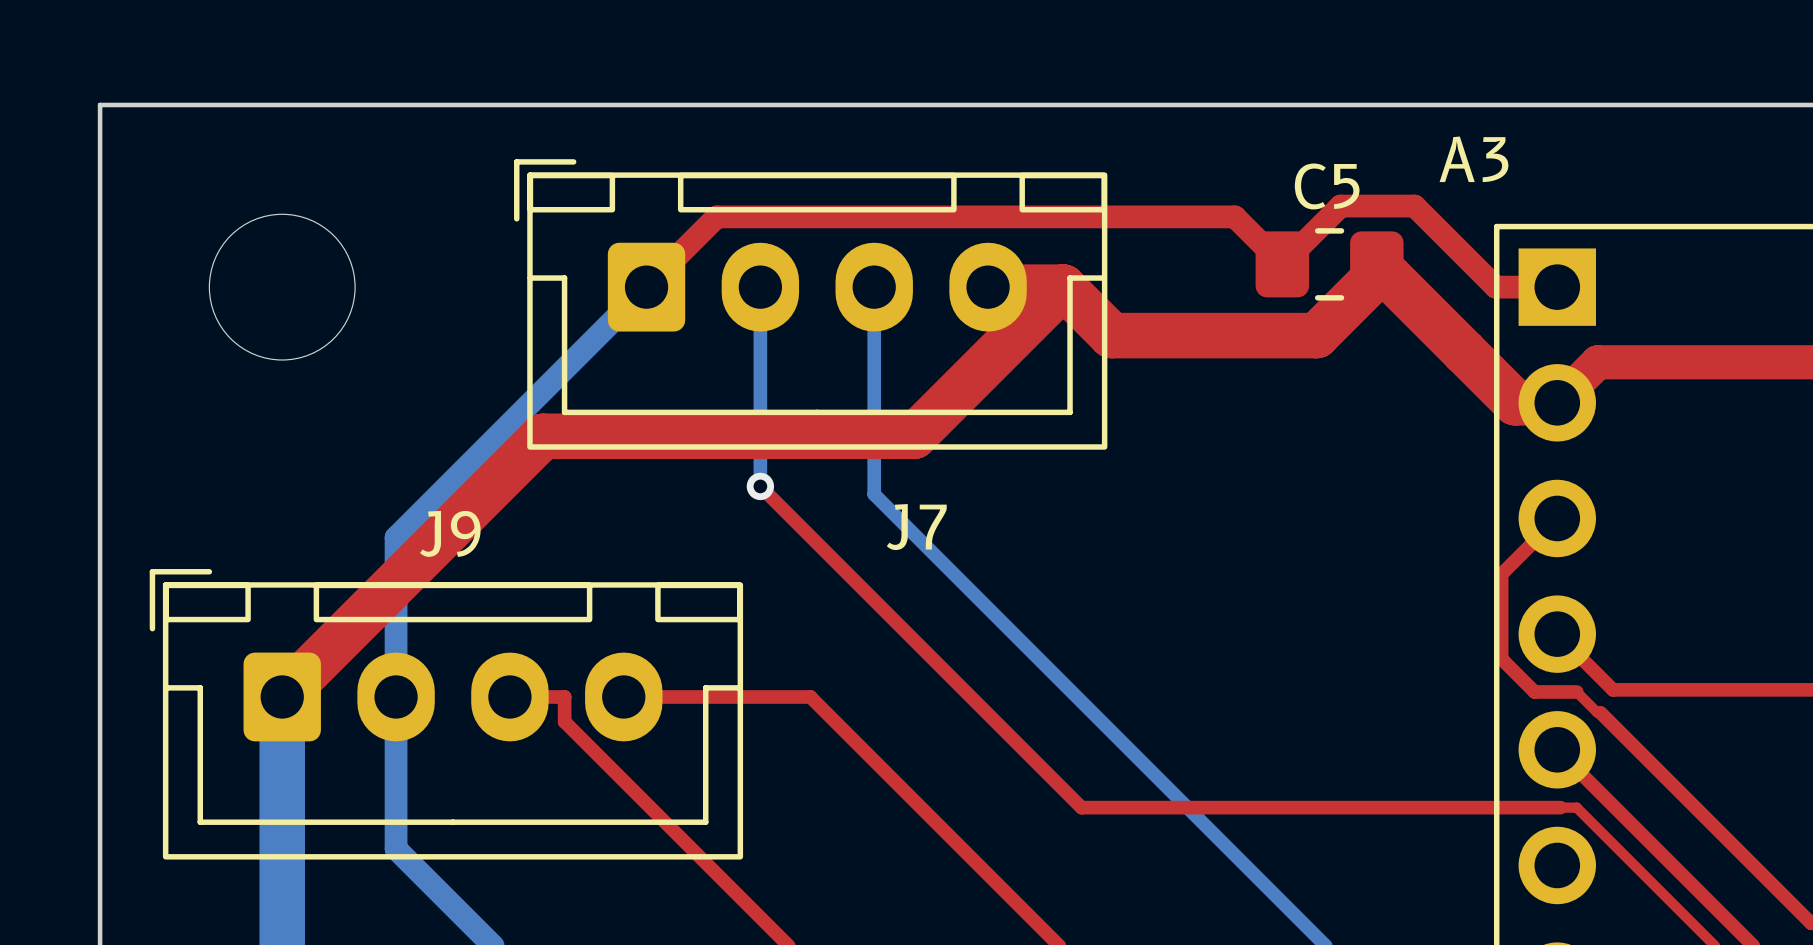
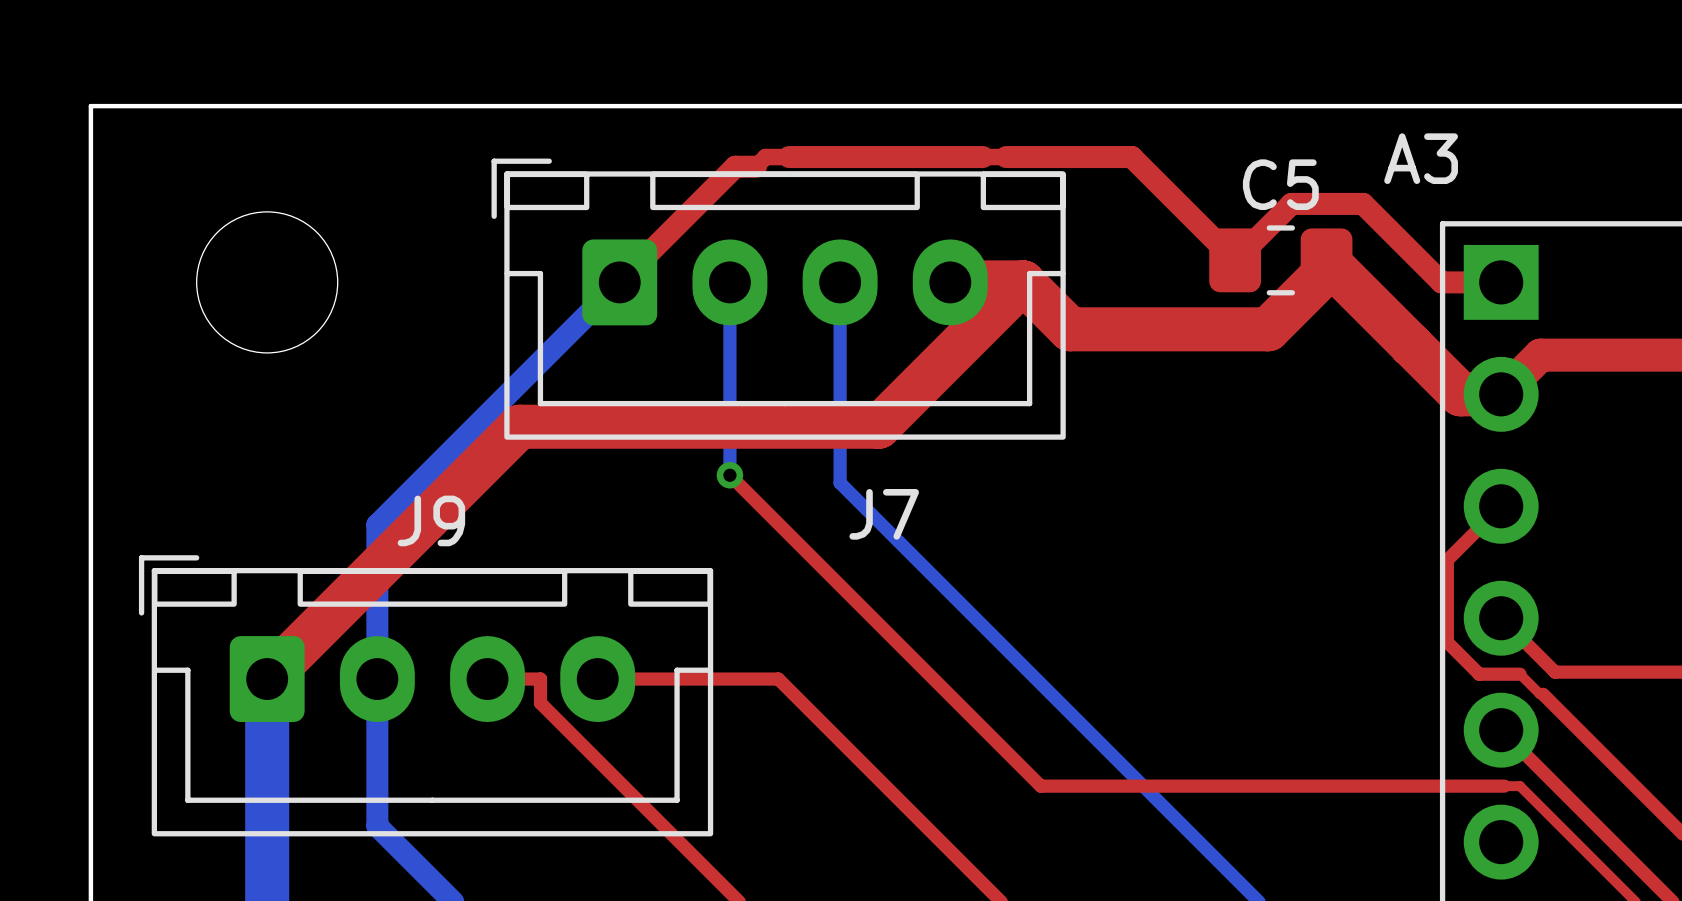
top track: (716, 216) (1234, 216) -> (687, 214) (735, 166) (755, 166) (765, 157) (1131, 157) (1189, 214)

